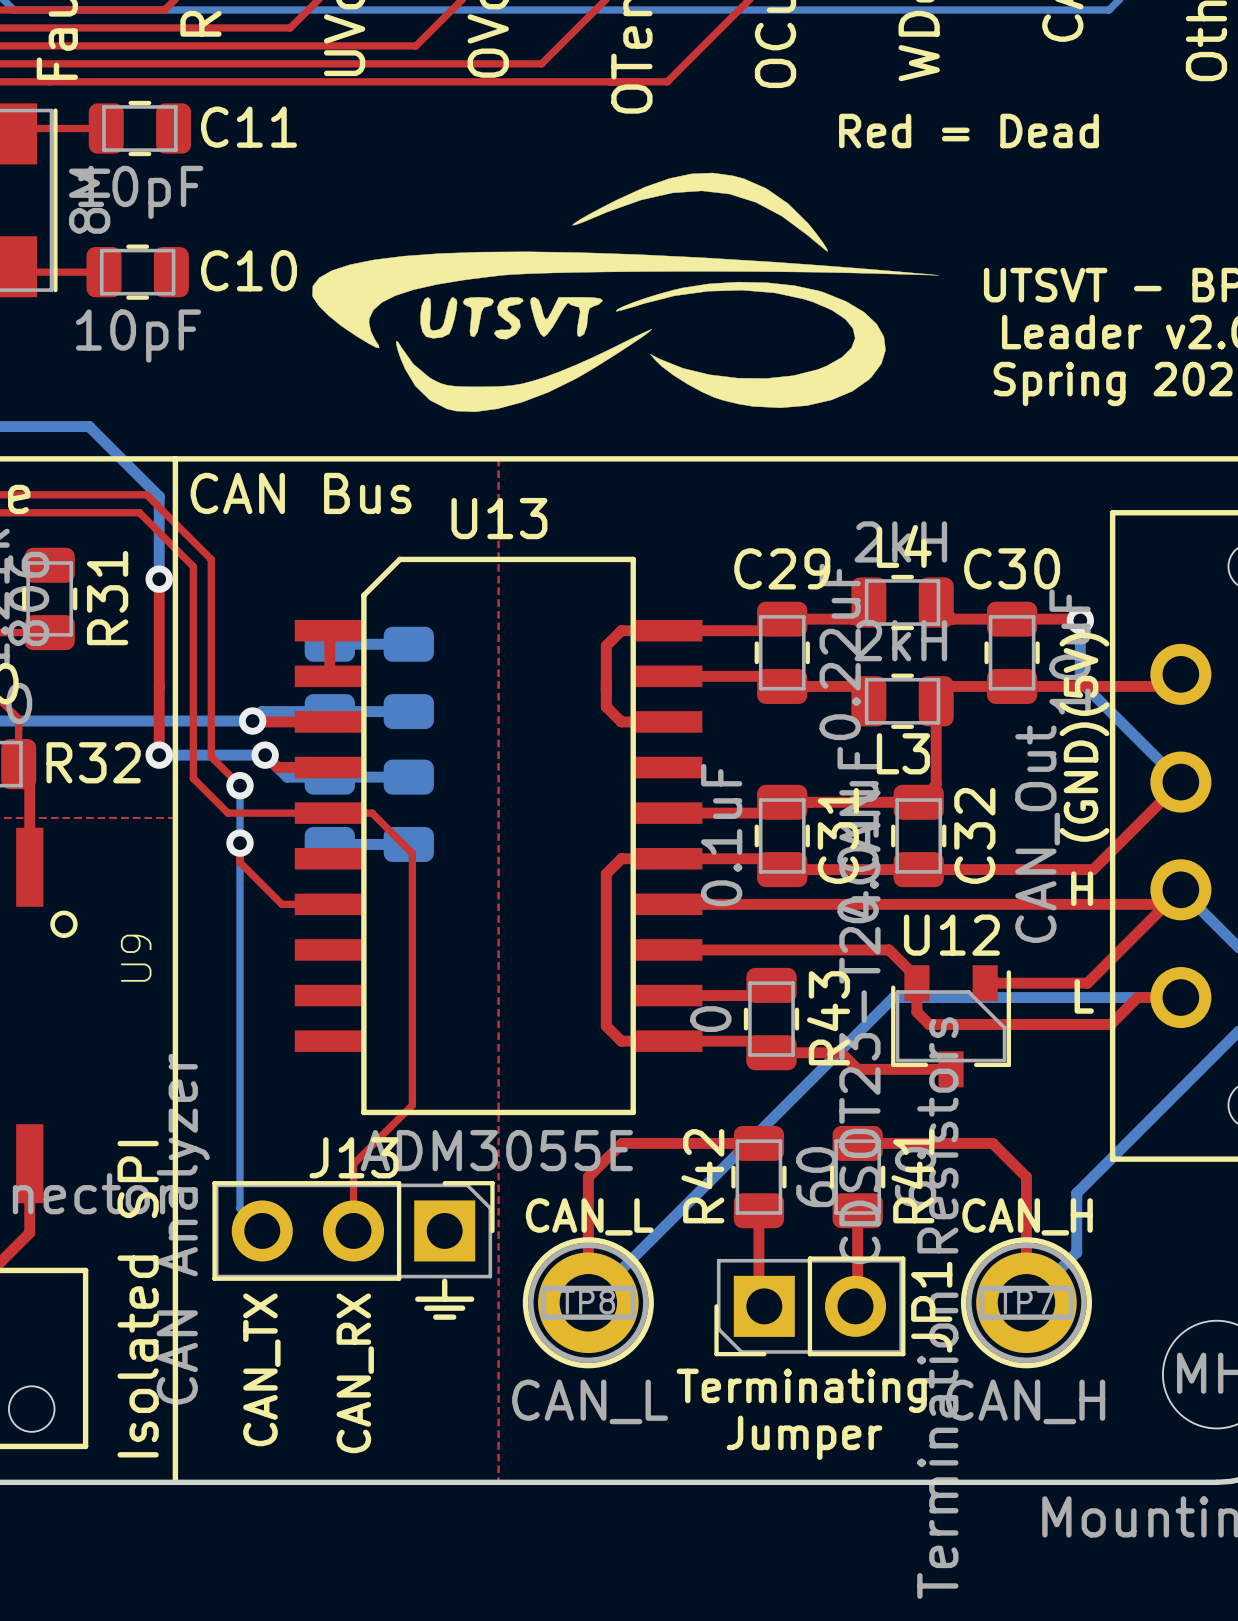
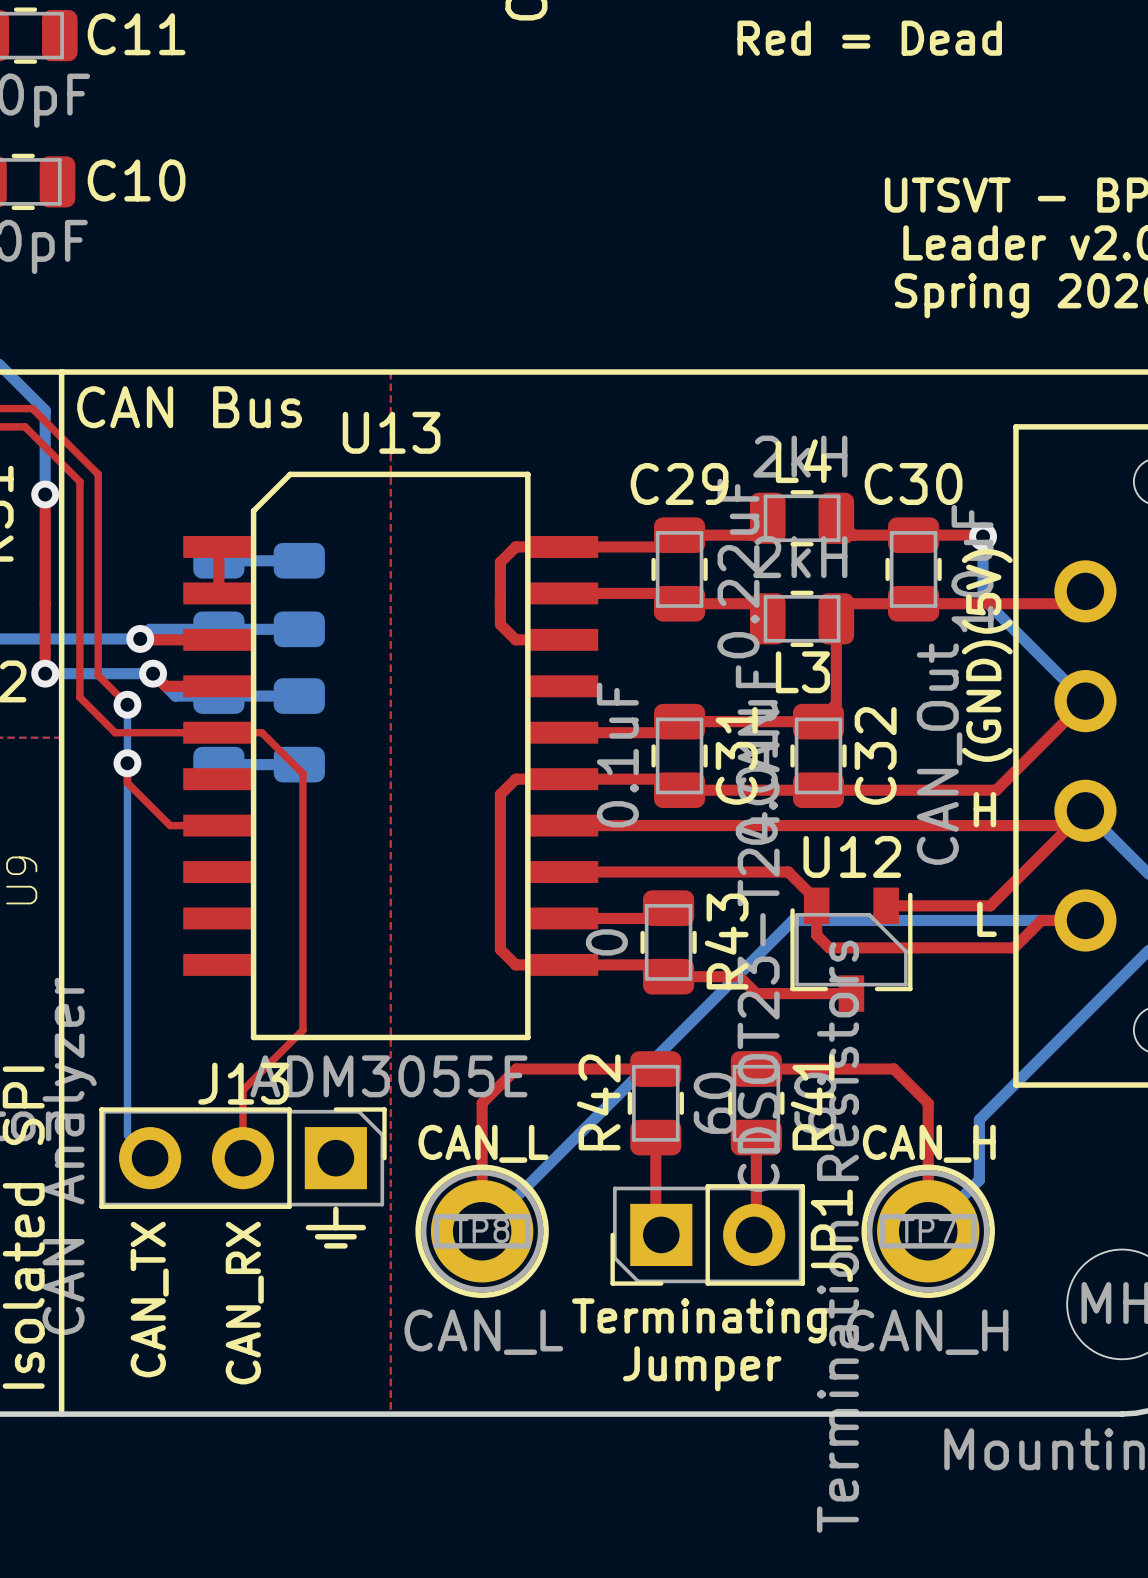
drawing: [312, 172, 940, 412] -> none

